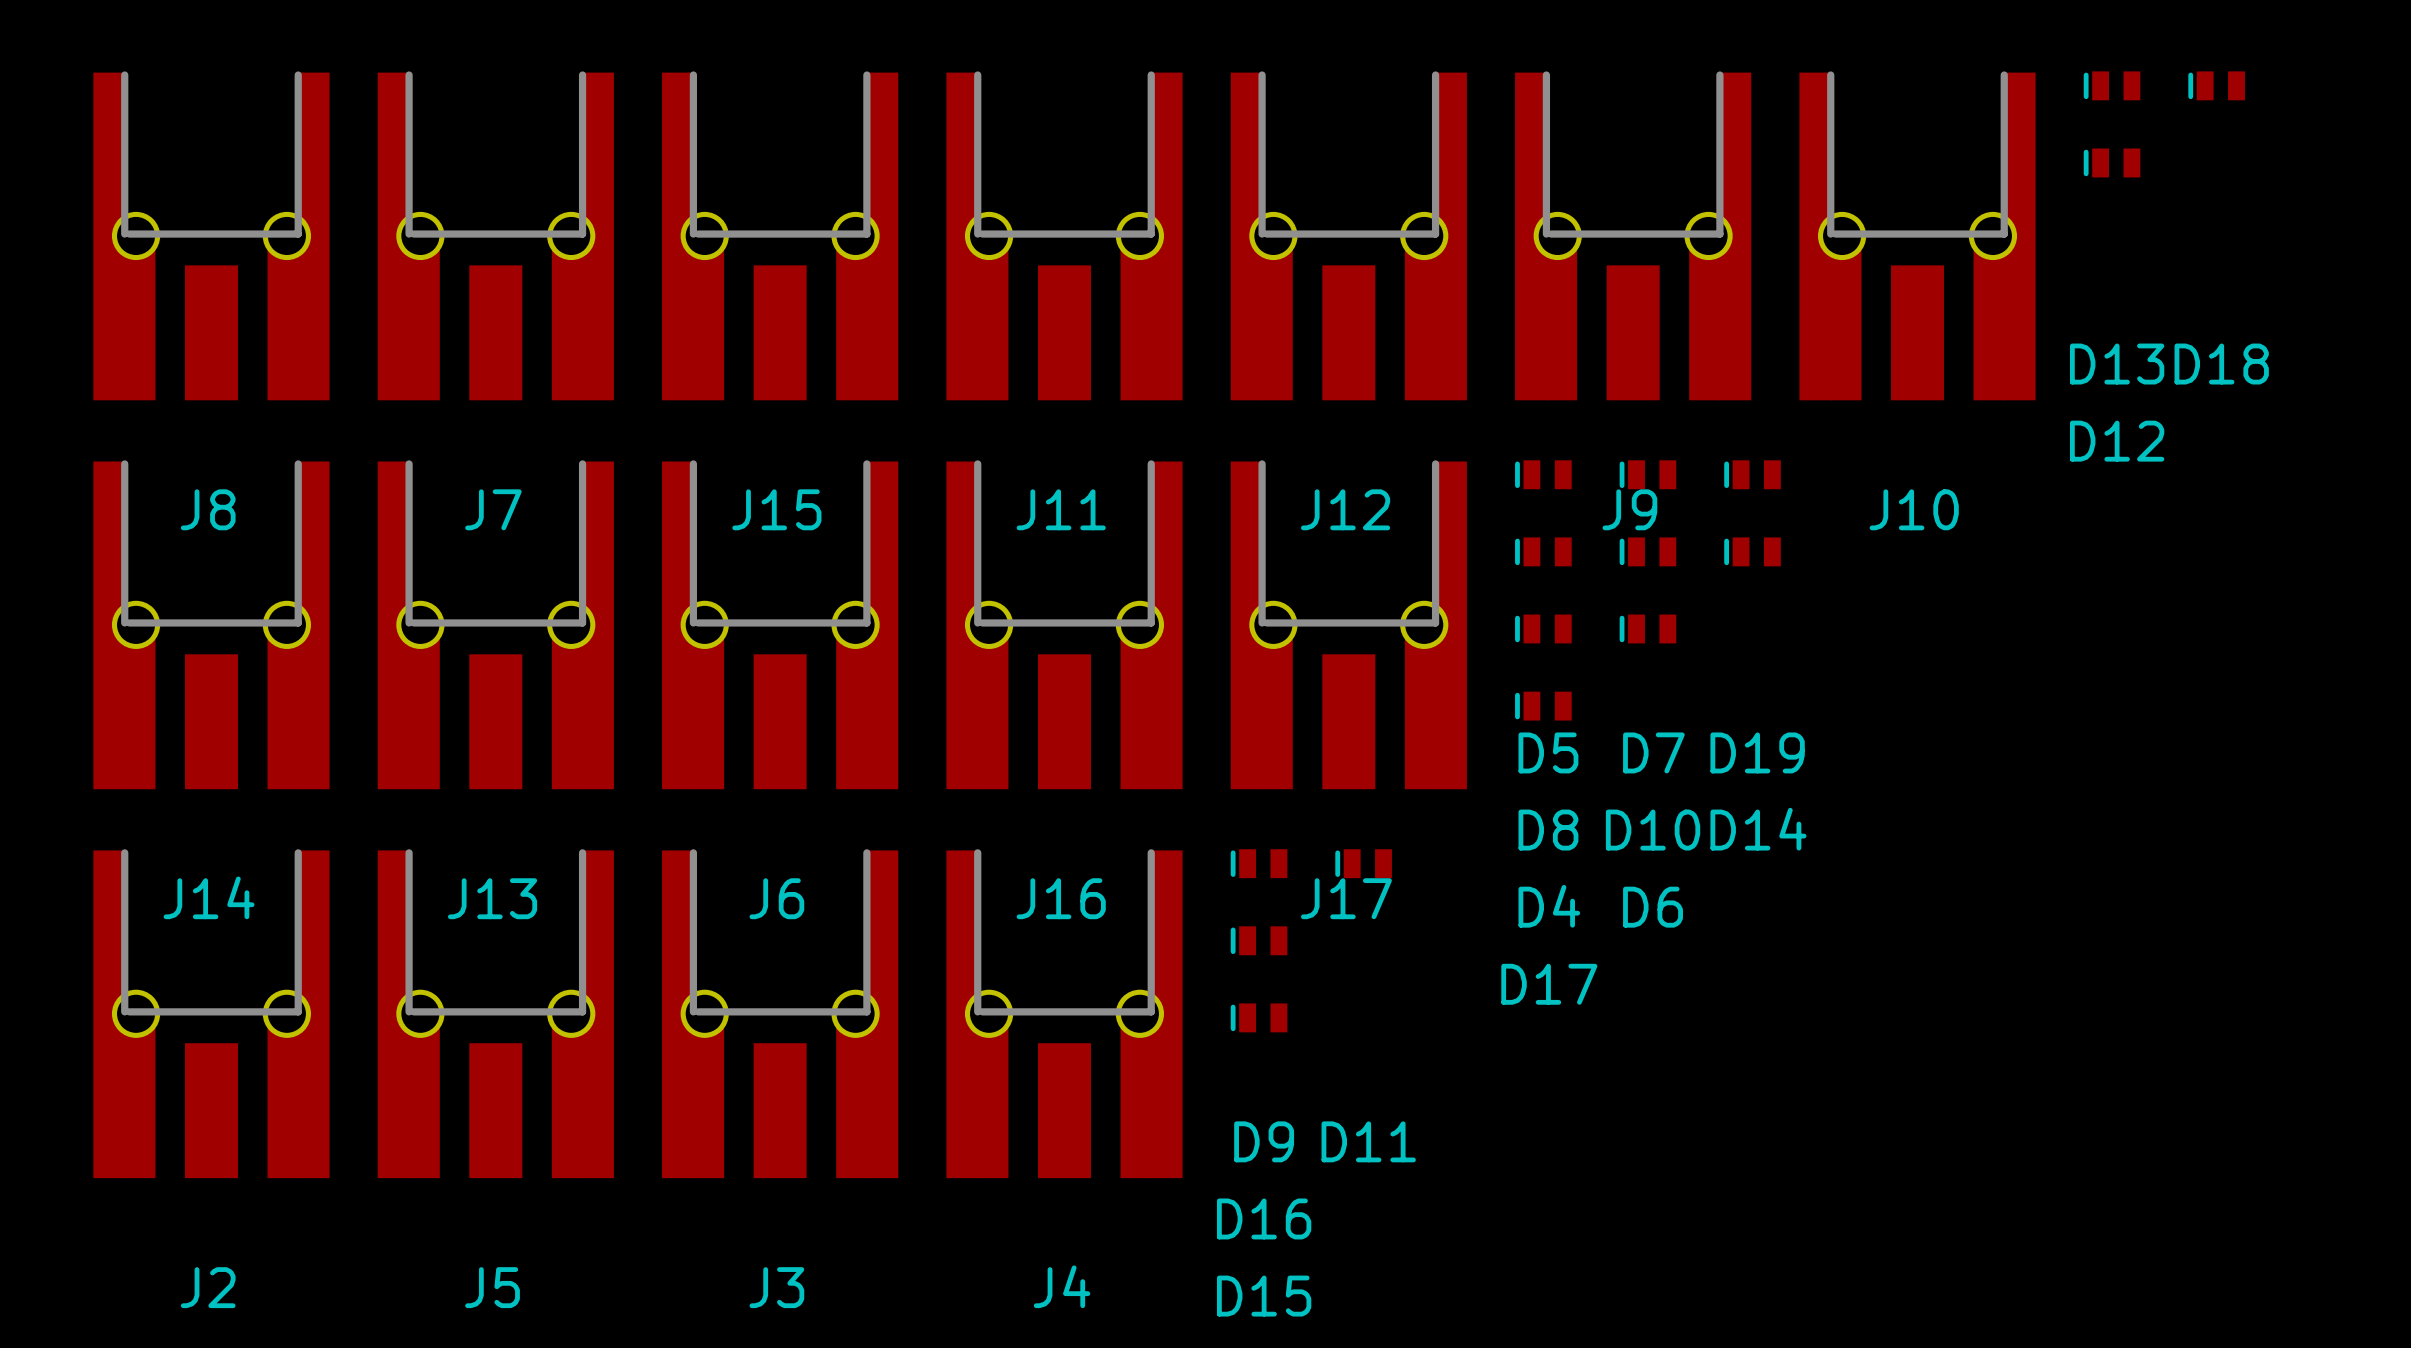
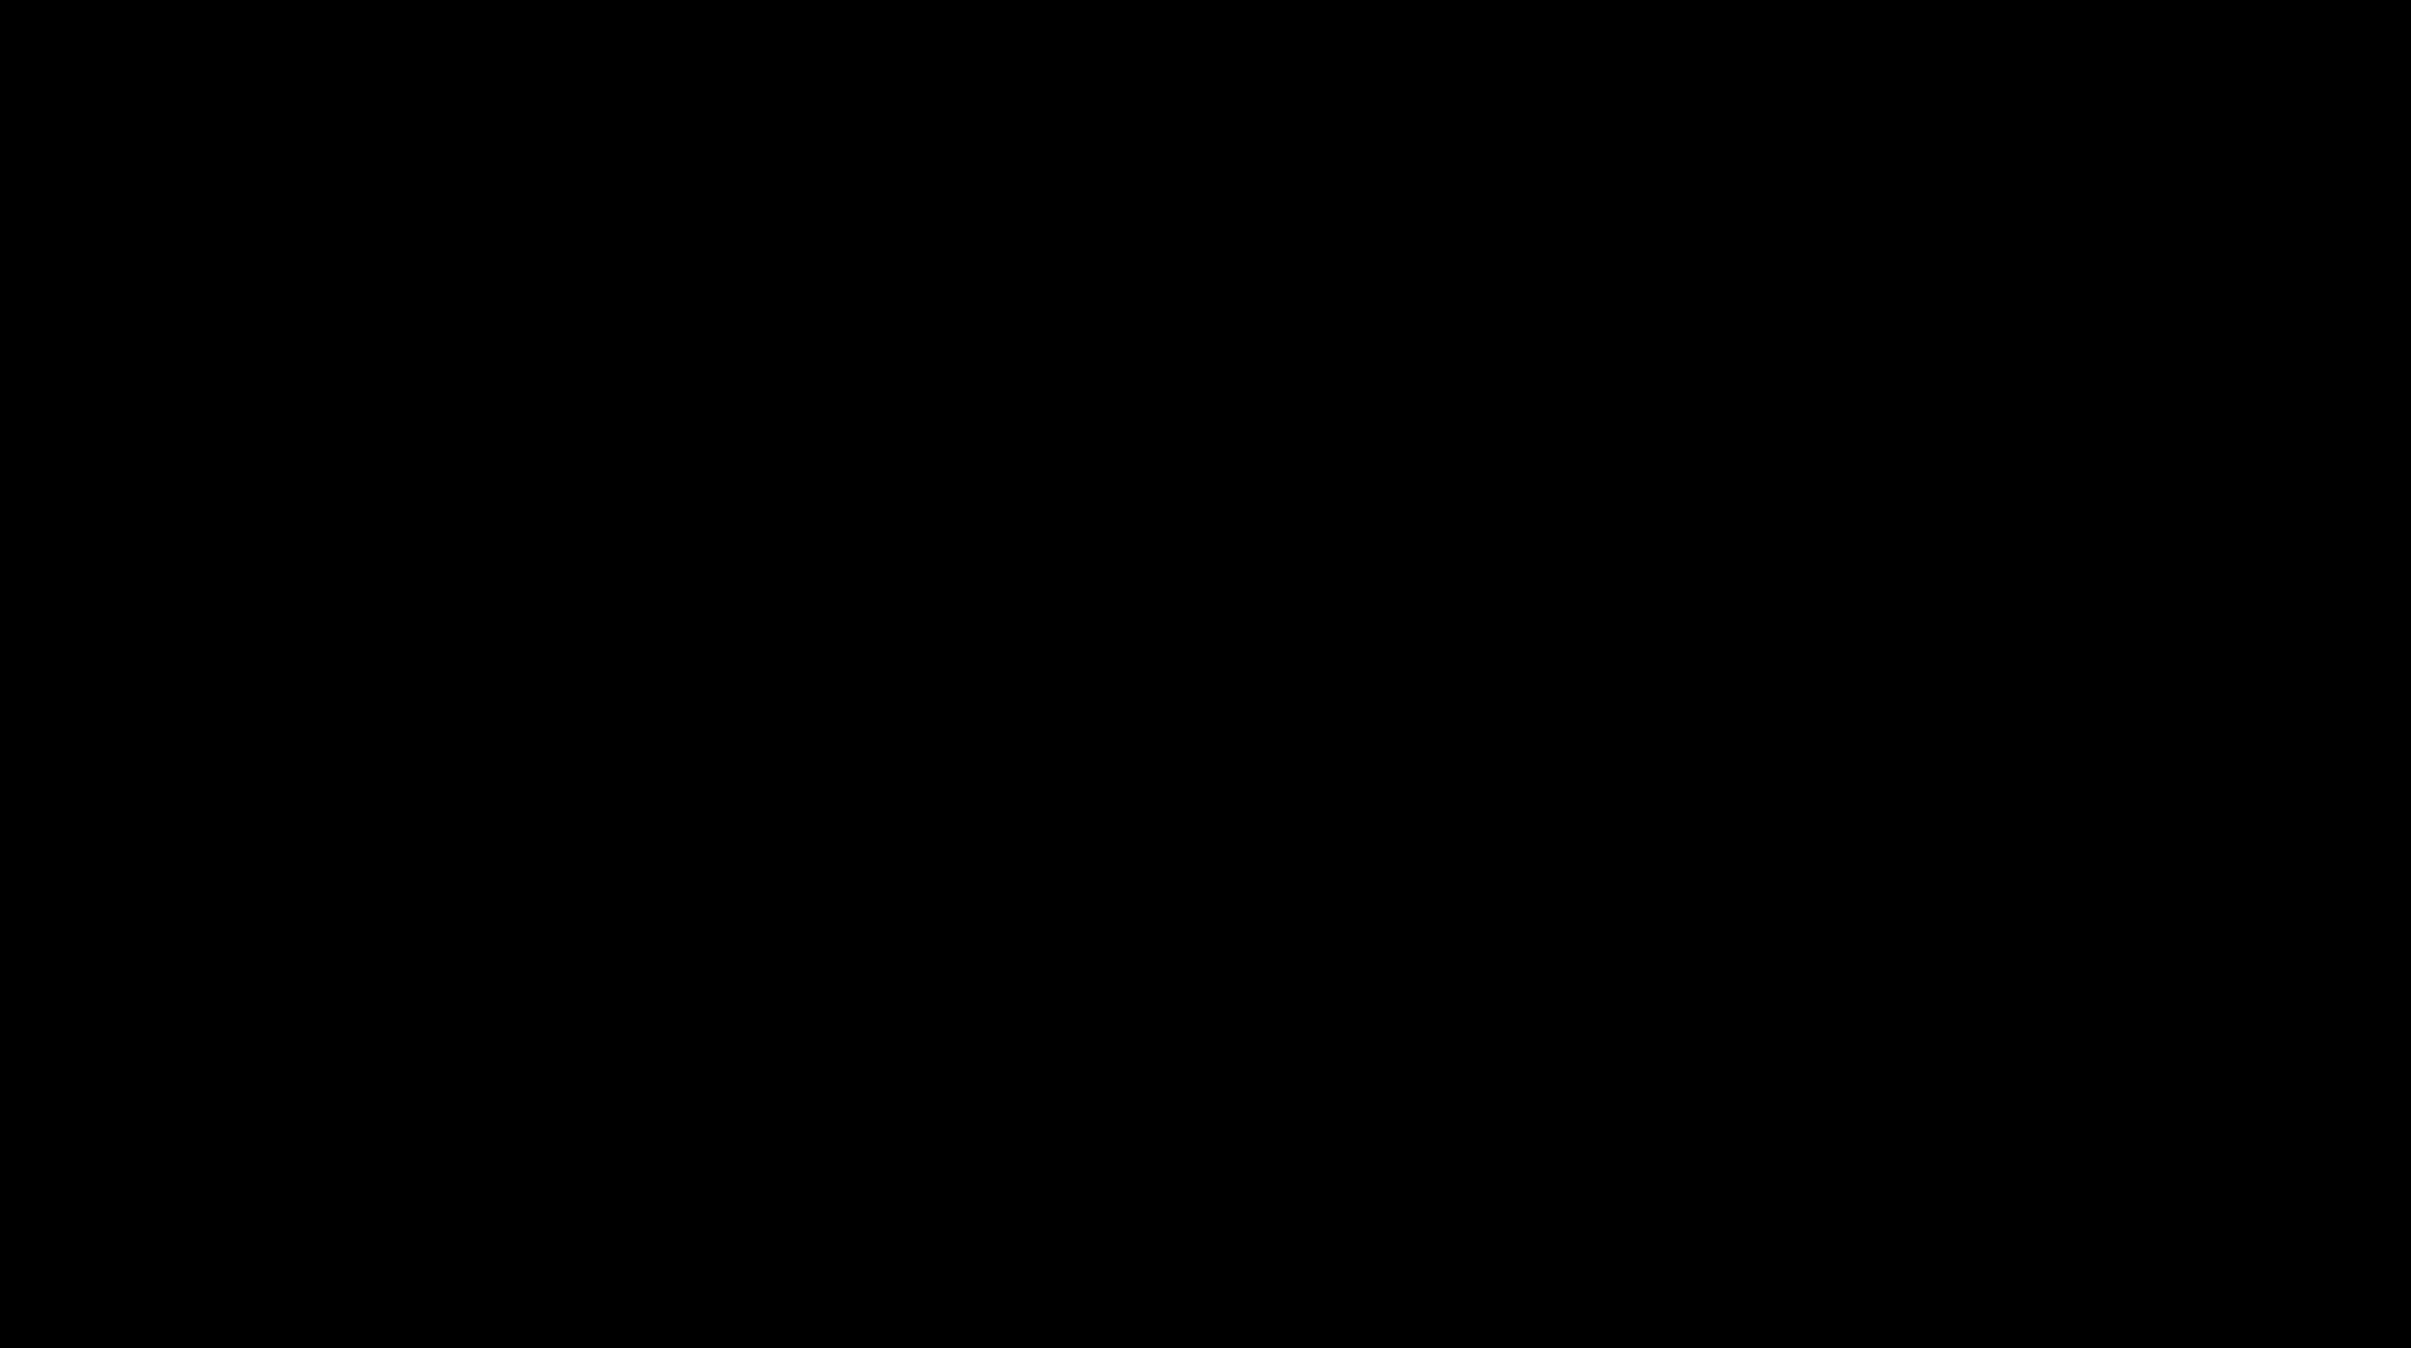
D13: (2112, 85) -> none
D18: (2216, 85) -> none
D12: (2112, 162) -> none
J8: (211, 235) -> none
J7: (495, 235) -> none
J15: (780, 235) -> none
J11: (1064, 235) -> none
J12: (1348, 235) -> none
J9: (1633, 235) -> none
J10: (1917, 235) -> none
D5: (1543, 474) -> none
D7: (1647, 474) -> none
D19: (1752, 474) -> none
D8: (1543, 551) -> none
D10: (1647, 551) -> none
D14: (1752, 551) -> none
J14: (211, 624) -> none
J13: (495, 624) -> none
J6: (780, 624) -> none
J16: (1064, 624) -> none
J17: (1348, 624) -> none
D4: (1543, 628) -> none
D6: (1647, 628) -> none
D17: (1543, 706) -> none
D9: (1259, 863) -> none
D11: (1363, 863) -> none
D16: (1259, 940) -> none
J2: (211, 1013) -> none
J5: (495, 1013) -> none
J3: (780, 1013) -> none
J4: (1064, 1013) -> none
D15: (1259, 1017) -> none

